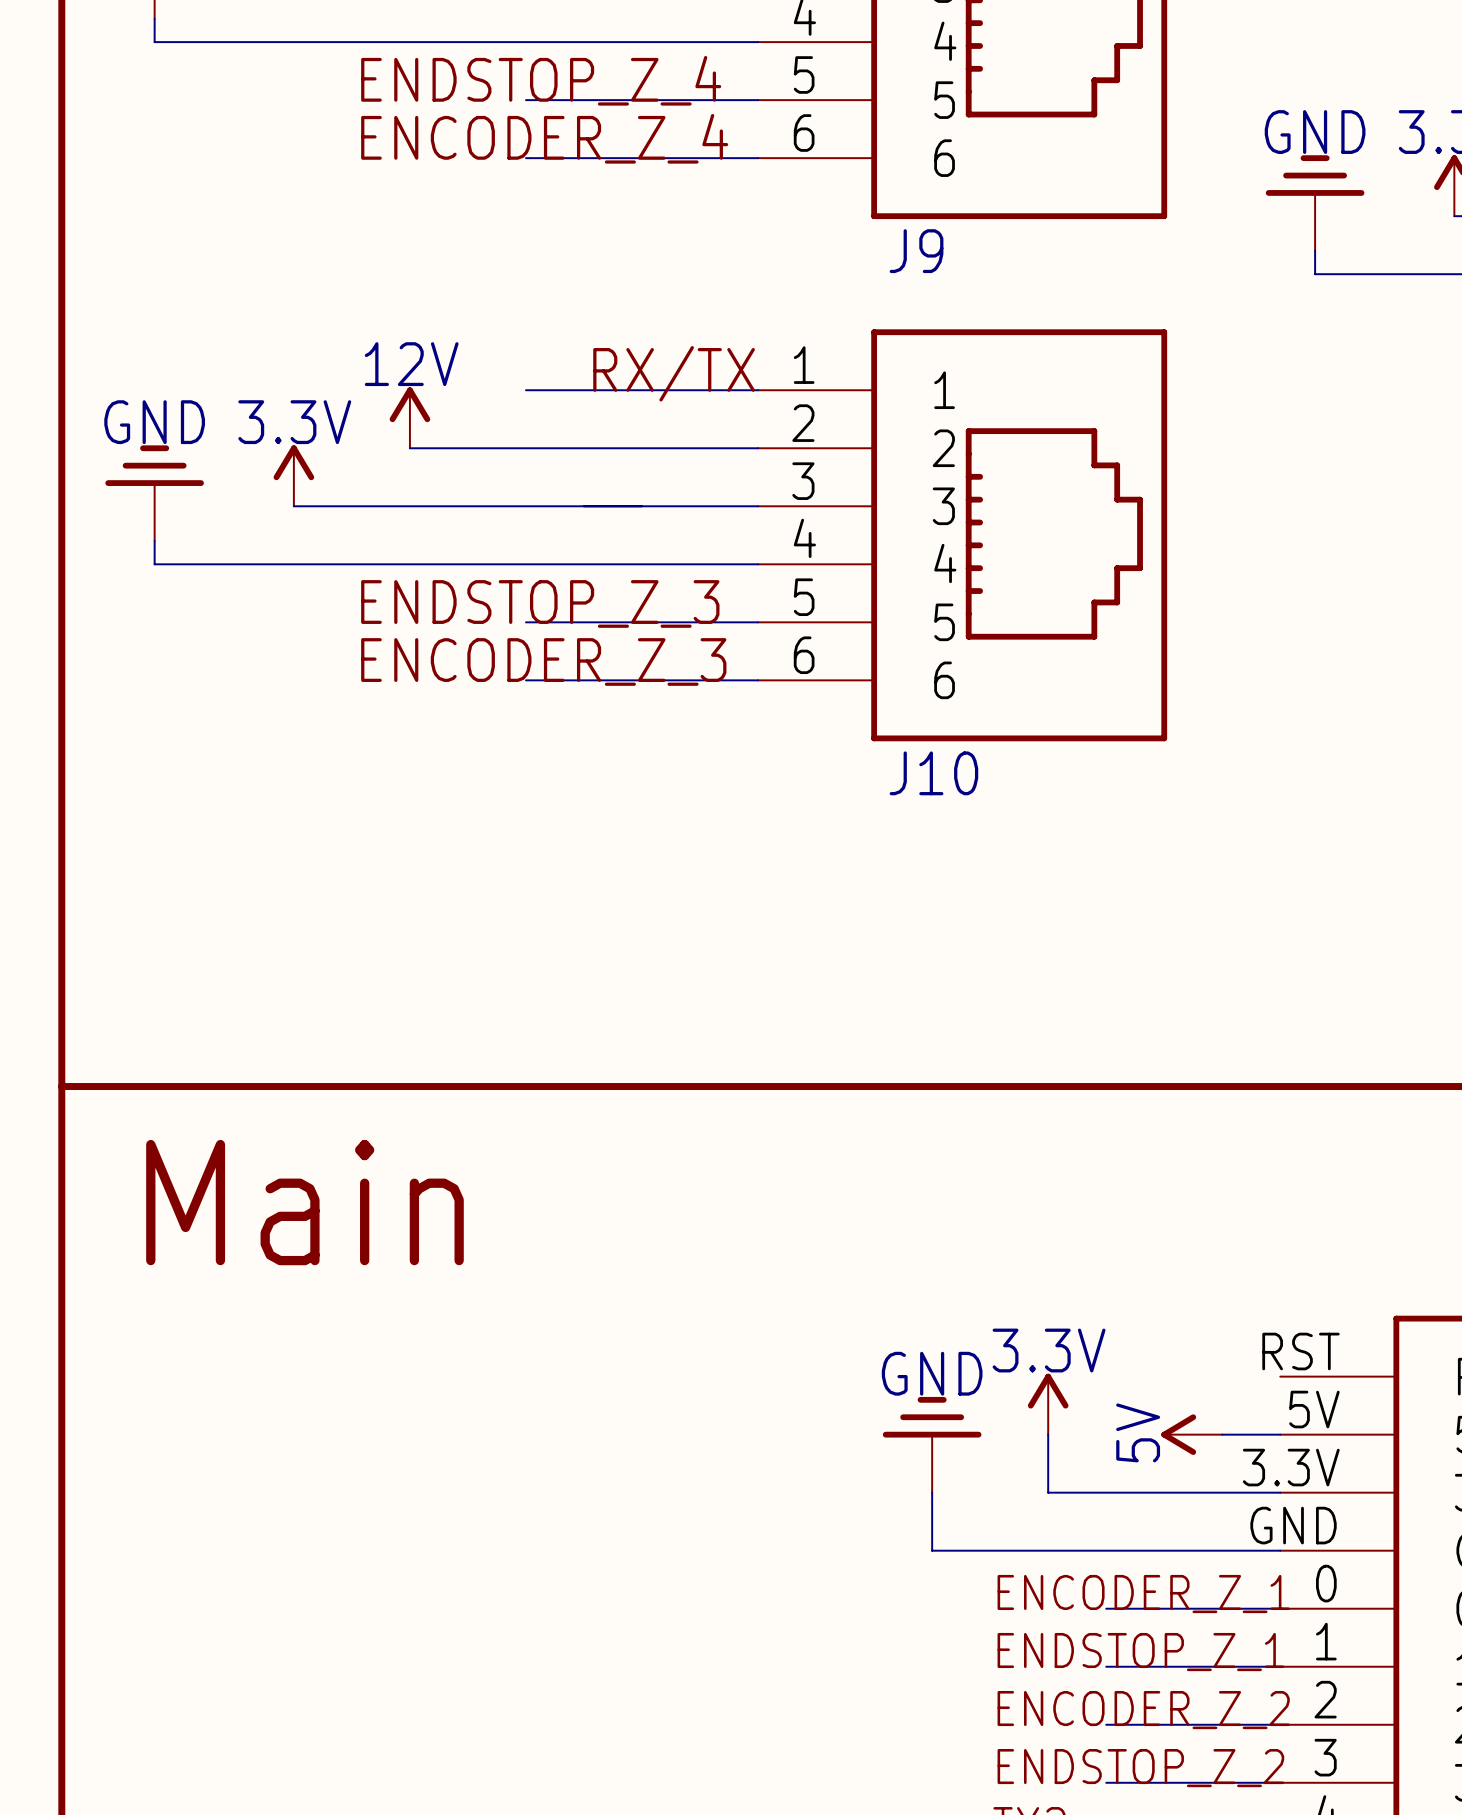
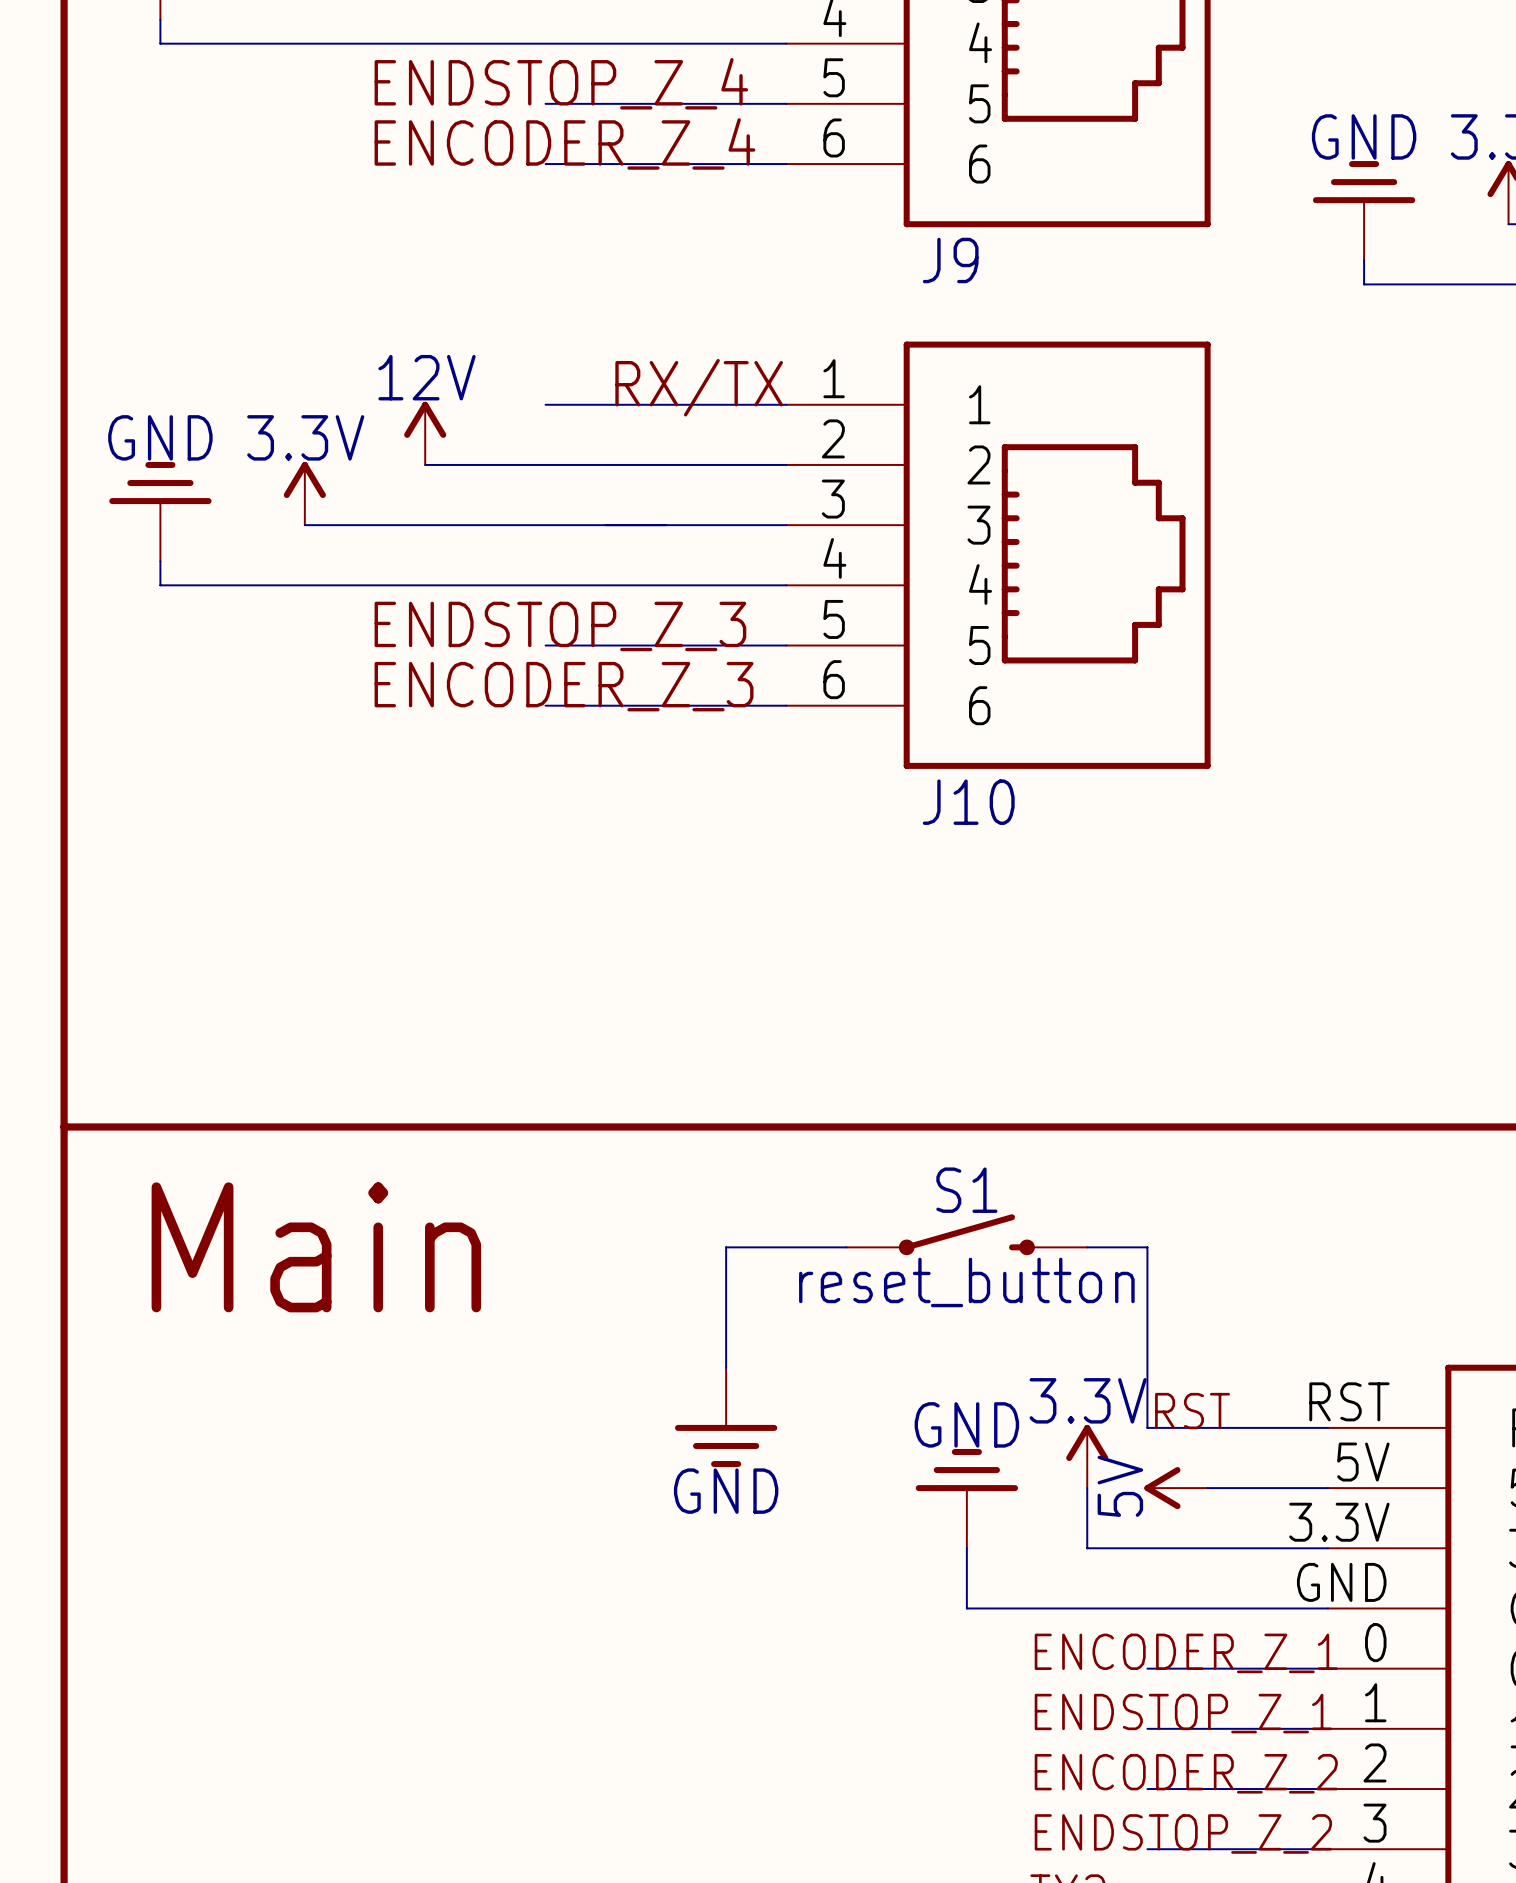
S1: none -> reset_button (966, 1234)
wire: none -> (846, 1247) (726, 1247) (726, 1367)
wire: none -> (1087, 1247) (1147, 1247) (1147, 1427) (1327, 1427)
label: none -> RST (1192, 1411)
power symbol: none -> GND (726, 1417)
power symbol position: 5V (1191, 1434) -> 5V (1176, 1488)

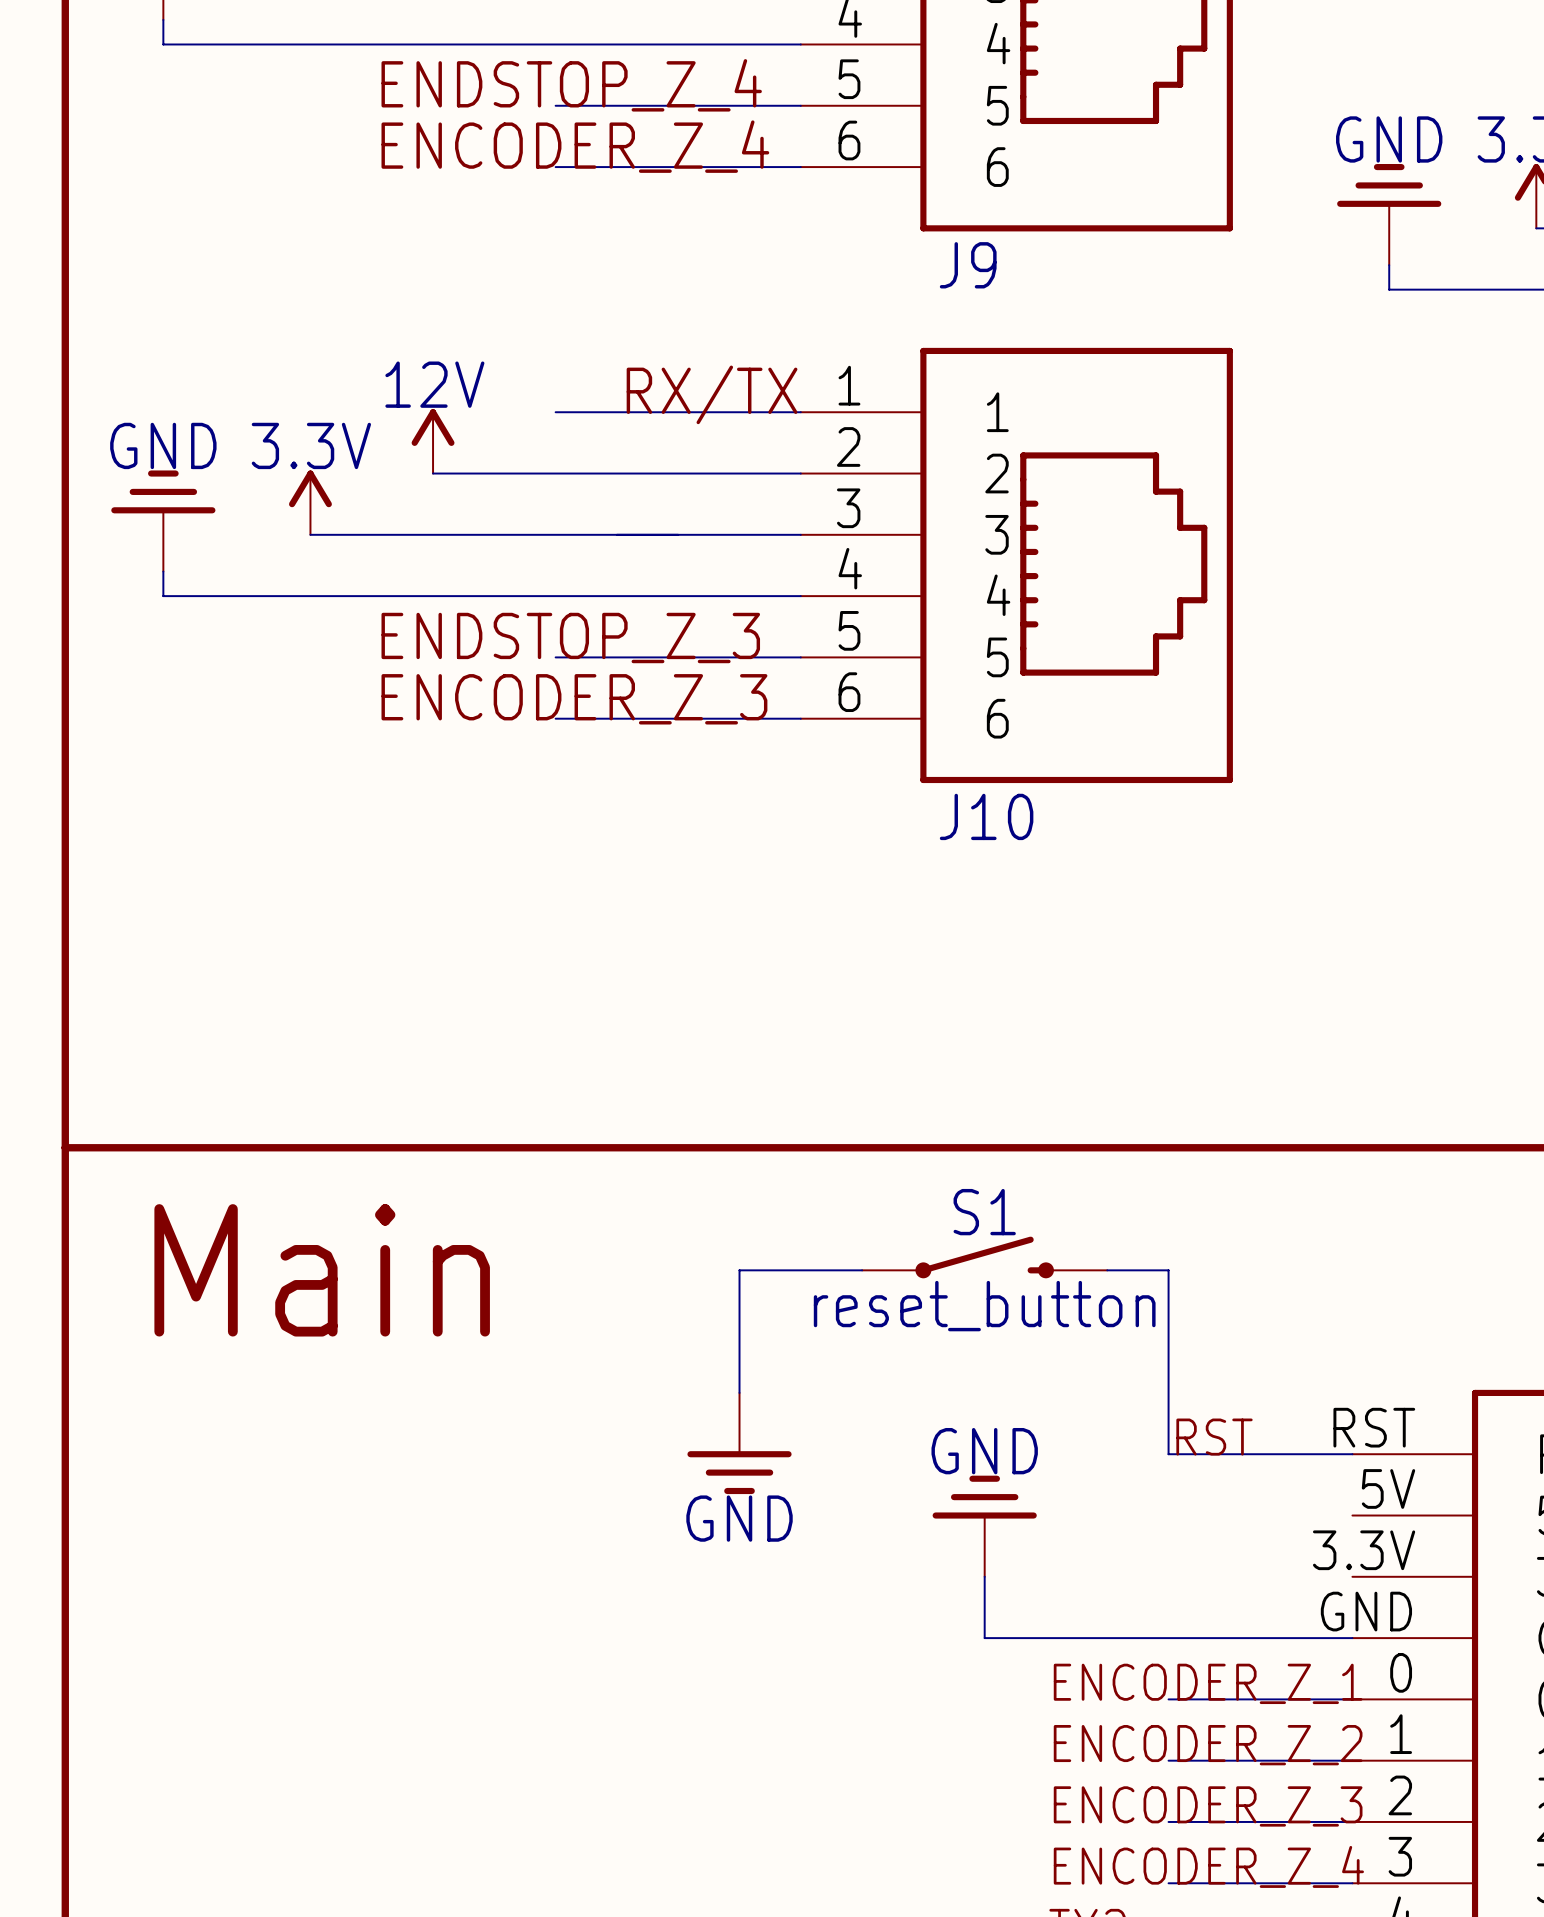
power symbol: 3.3V (1087, 1456) -> none
wire: (1087, 1488) (1087, 1548) (1327, 1548) -> none
power symbol: 5V (1176, 1488) -> none
wire: (1207, 1488) (1327, 1488) -> none
label: ENDSTOP_Z_1 (1183, 1713) -> ENCODER_Z_2 (1208, 1745)
label: ENCODER_Z_2 (1186, 1773) -> ENCODER_Z_3 (1208, 1806)
label: ENDSTOP_Z_2 (1183, 1833) -> ENCODER_Z_4 (1208, 1866)

